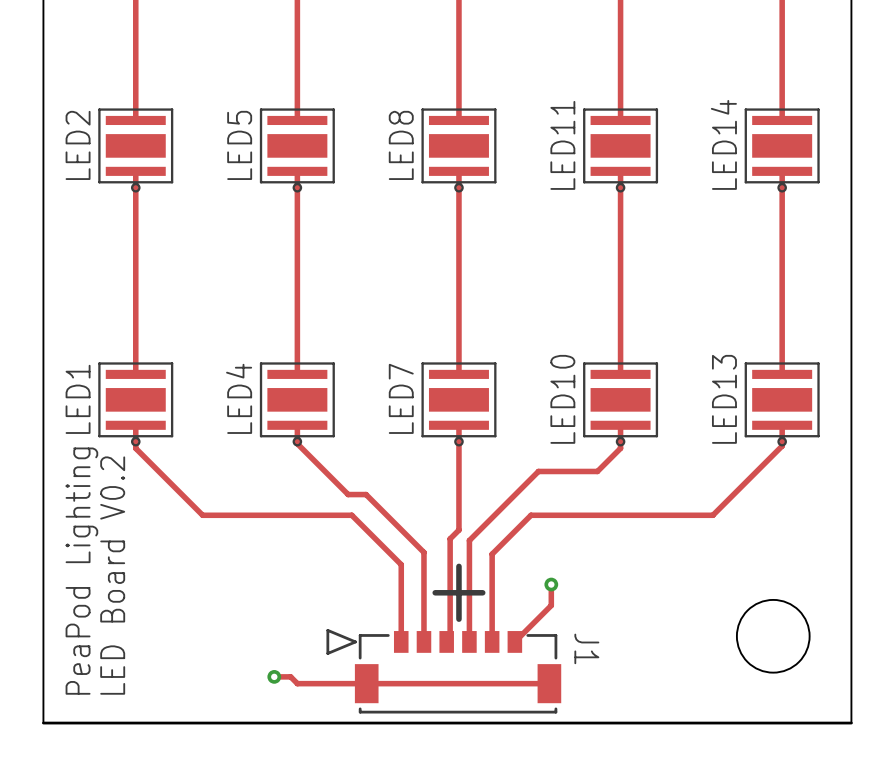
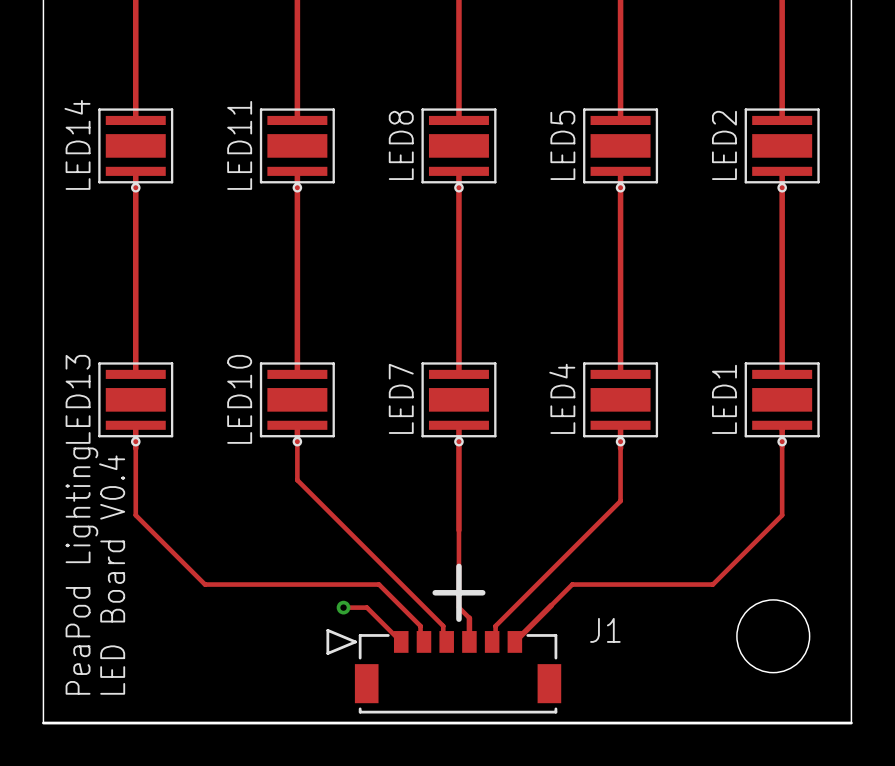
LED14 name: LED14 (723, 144) -> LED2 (724, 145)
LED2 name: LED2 (78, 145) -> LED14 (77, 144)
LED5 name: LED5 (239, 145) -> LED11 (239, 145)
LED11 name: LED11 (562, 145) -> LED5 (562, 145)
LED4 name: LED4 (239, 398) -> LED10 (239, 399)
LED1 name: LED1 (78, 399) -> LED13 (78, 399)
LED10 name: LED10 (562, 399) -> LED4 (562, 398)
LED13 name: LED13 (724, 399) -> LED1 (724, 399)
track: (297, 443) (348, 494) (366, 494) (423, 552) (423, 641) -> (297, 443) (297, 480) (443, 626) (443, 638) (446, 641)
track: (782, 446) (712, 515) (531, 515) (492, 554) (492, 641) -> (782, 446) (782, 515) (712, 584) (572, 584) (551, 605)
track: (135, 448) (202, 515) (351, 515) (401, 564) (401, 641) -> (135, 448) (135, 515) (205, 584) (379, 584) (420, 626) (420, 638) (423, 641)
track: (620, 448) (597, 471) (538, 471) (469, 540) (469, 618) -> (620, 448) (620, 501) (495, 626) (495, 638) (492, 641)
track: (458, 530) (450, 538) (450, 638) (446, 641) -> (458, 530) (458, 607) (469, 618)
text: LED Board V0.2 (112, 575) -> LED Board V0.4 (112, 575)
track: (551, 584) (551, 605) -> none
via: (551, 584) -> none
track: none -> (343, 607) (366, 607) (401, 641)
J1 name rotation: 0° (586, 648) -> 90° counterclockwise (605, 630)
track: (274, 676) (290, 676) (297, 683) (549, 683) -> none
via position: (274, 676) -> (343, 607)

